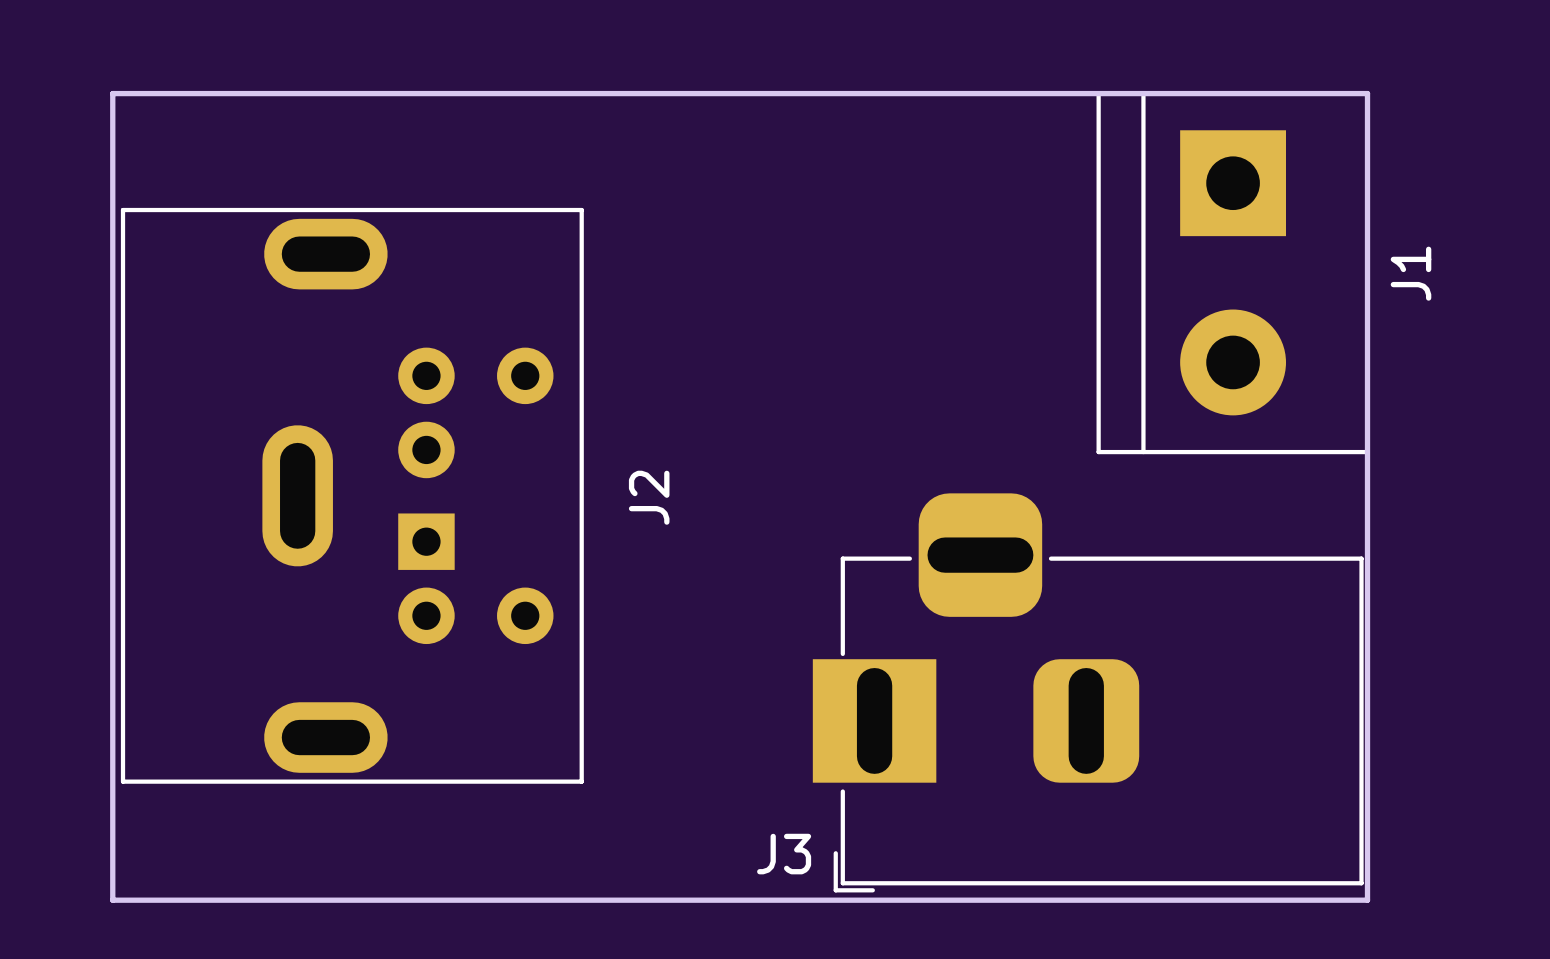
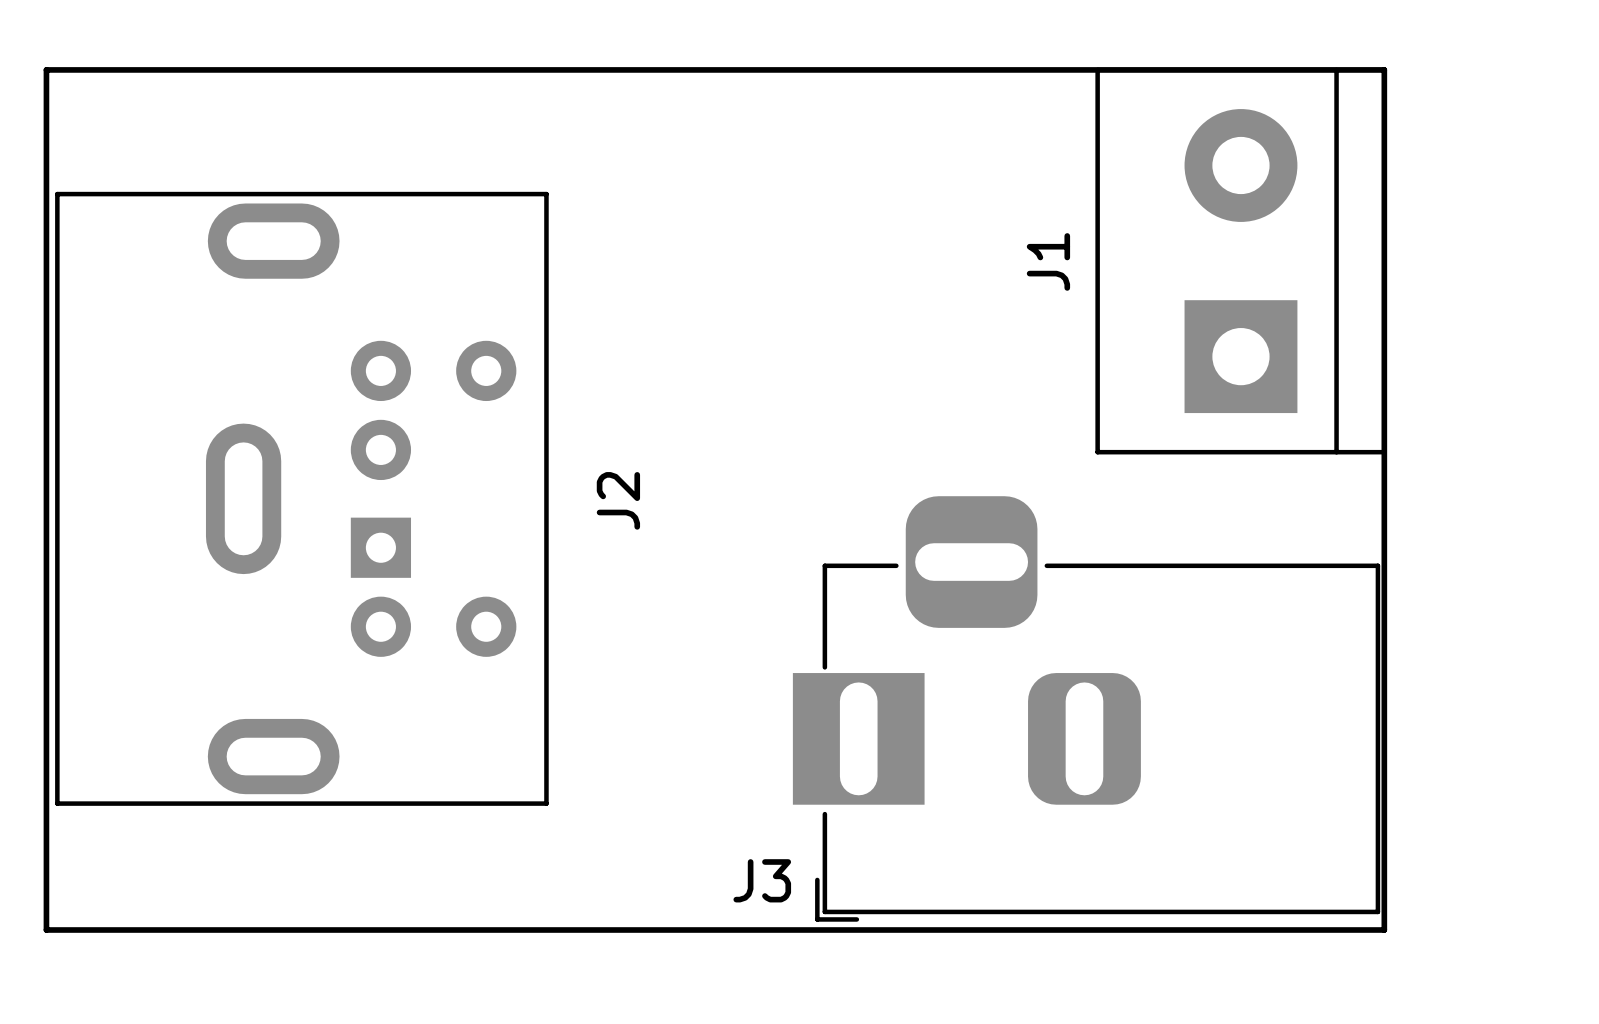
J1 rotation: 0° (1233, 272) -> 180° (1240, 261)

